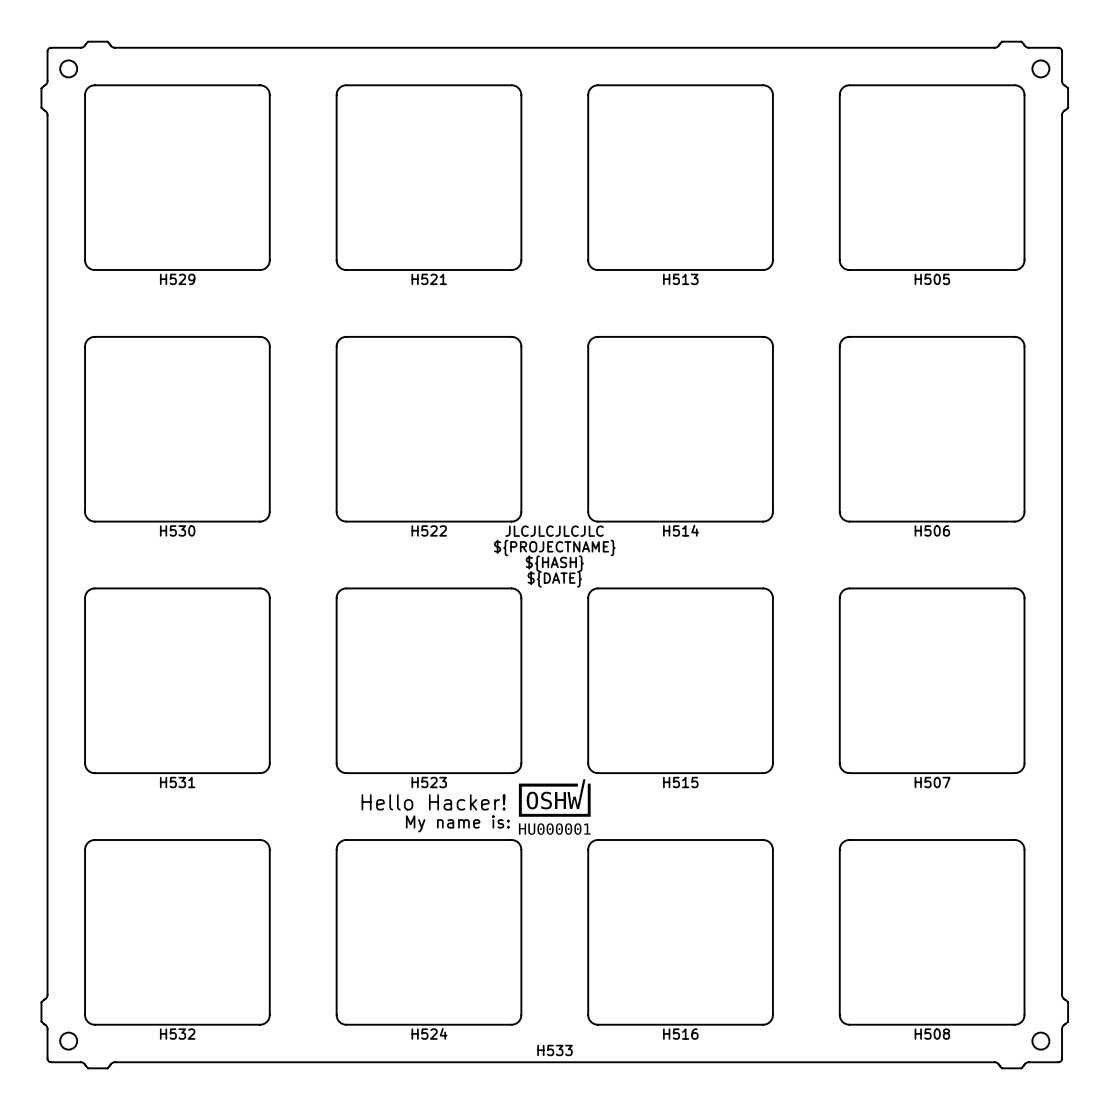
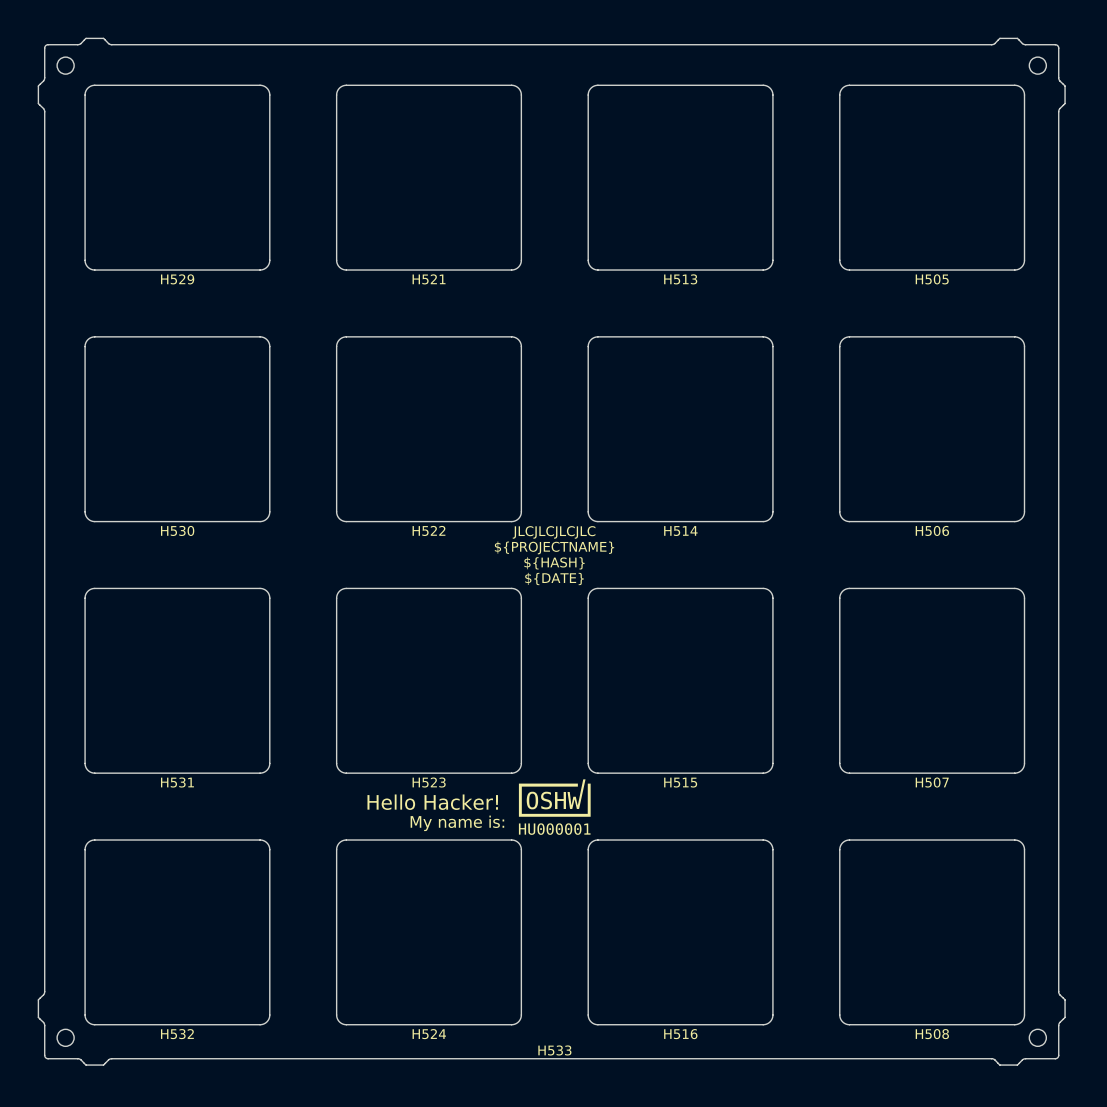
H533 footprint: [41, 41, 1069, 1069] -> [38, 38, 1066, 1066]

